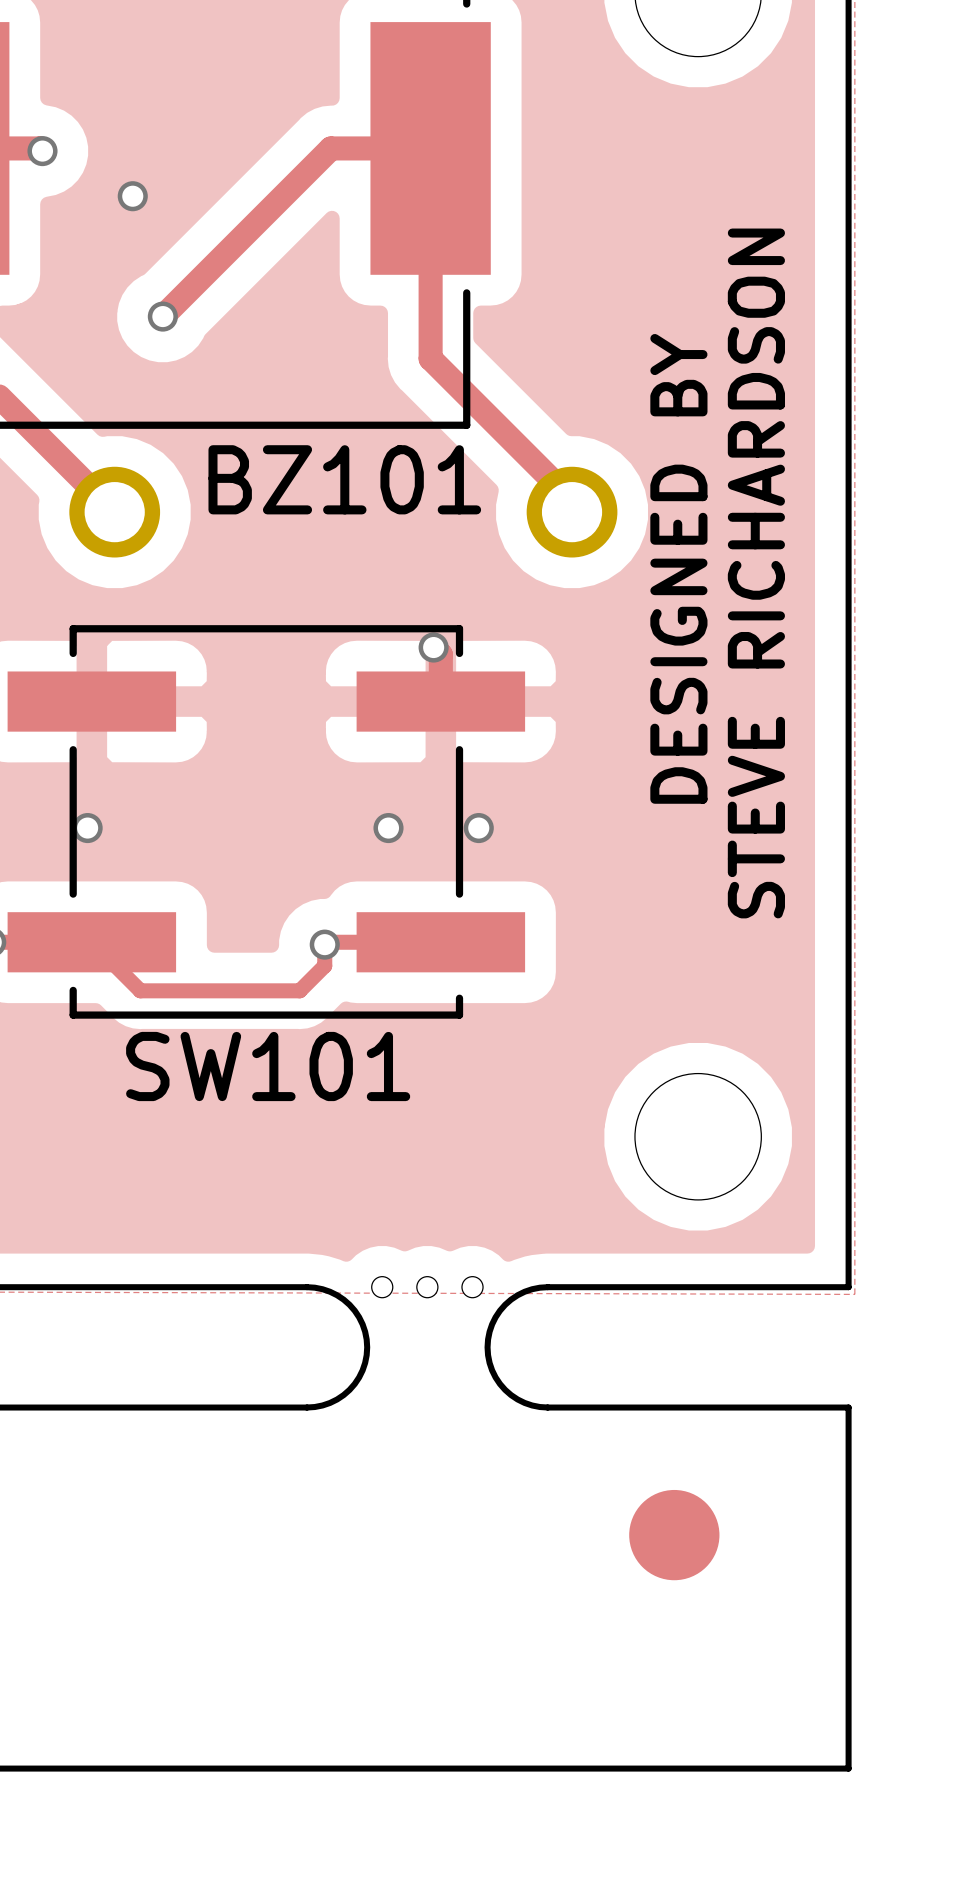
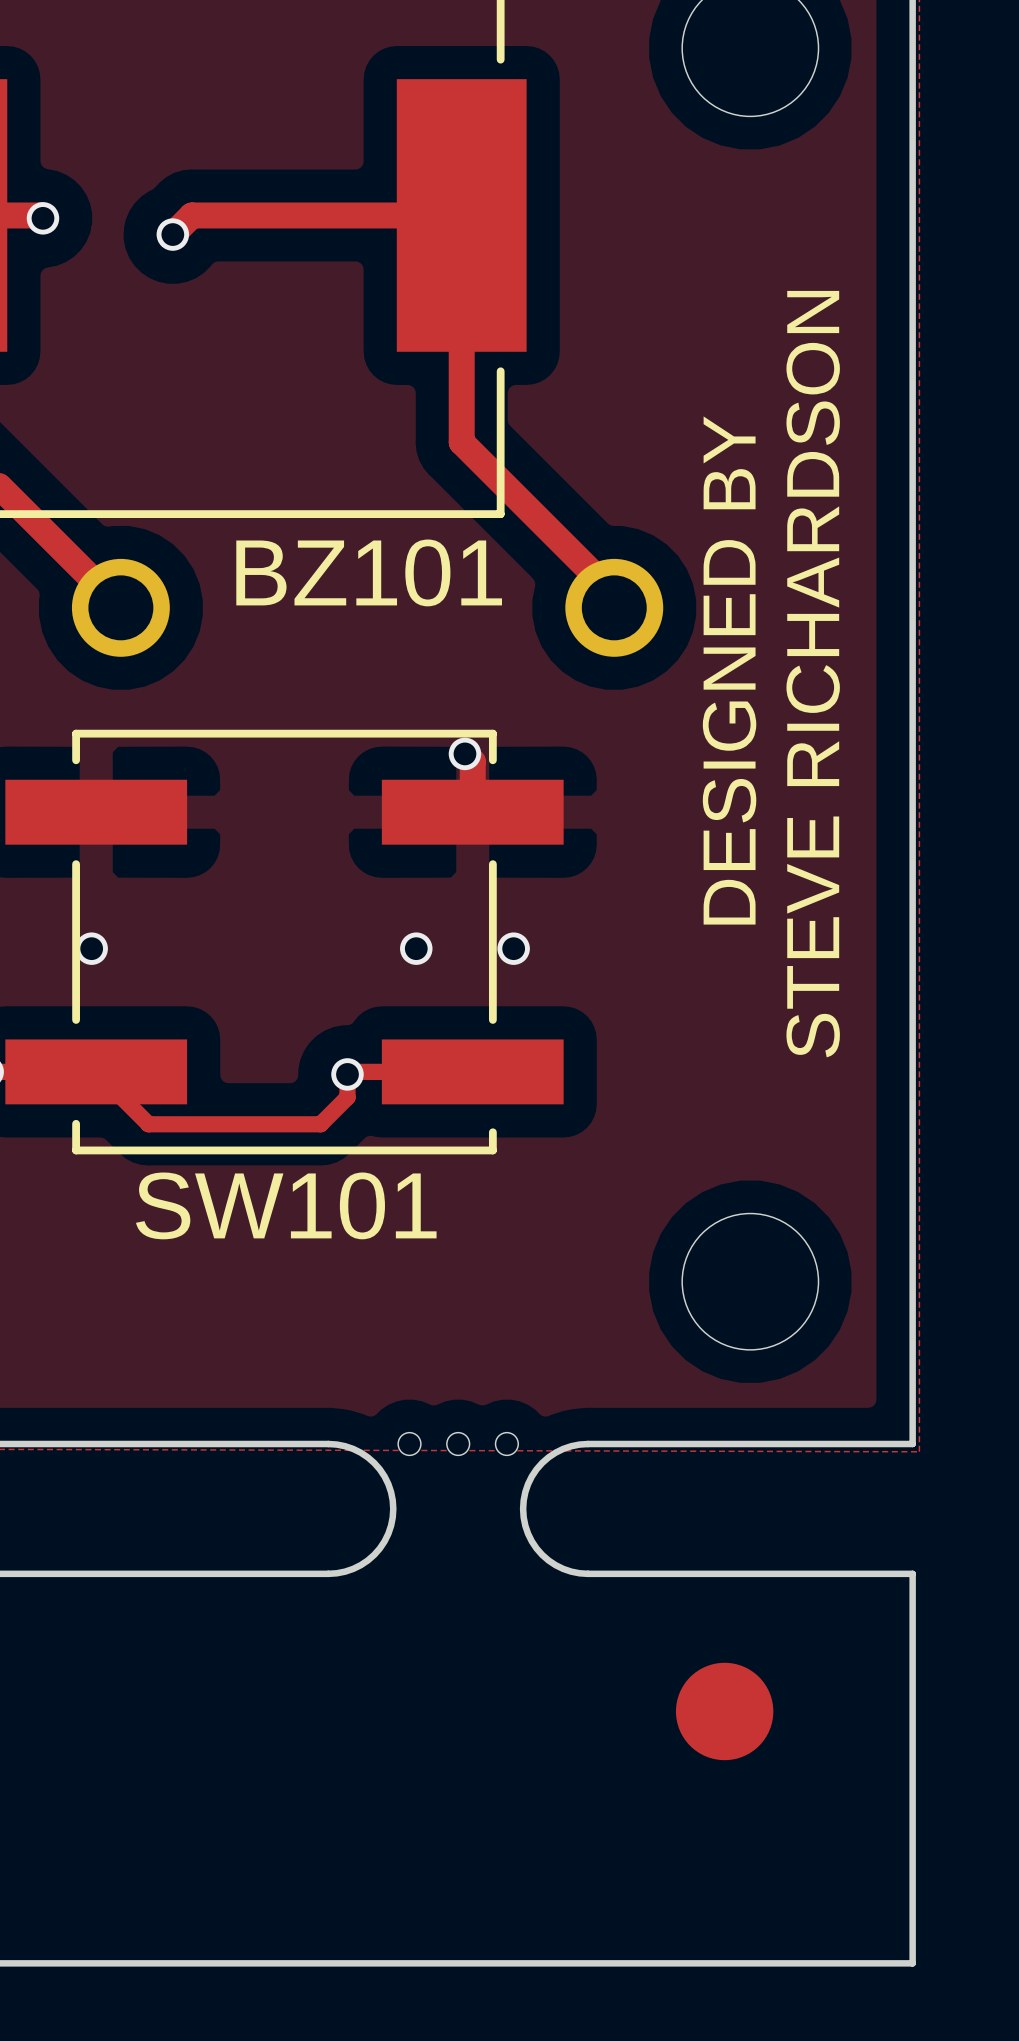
track: (330, 148) (162, 316) -> (354, 215) (191, 215) (172, 234)
via position: (132, 196) -> (172, 234)
via: (162, 316) -> none

